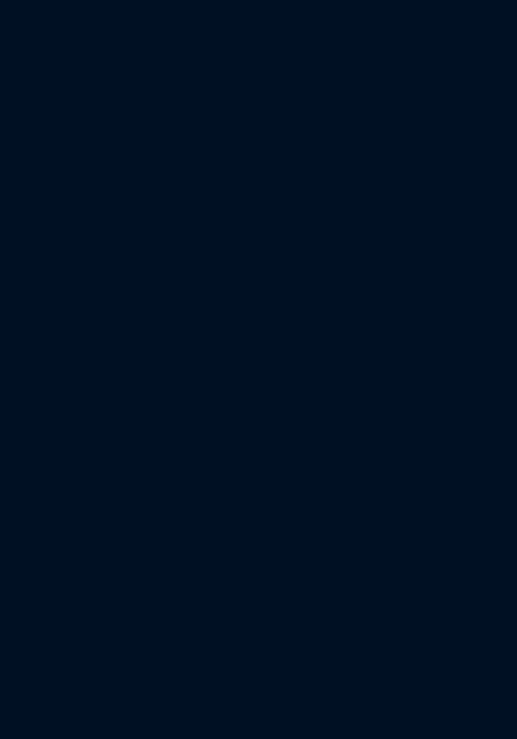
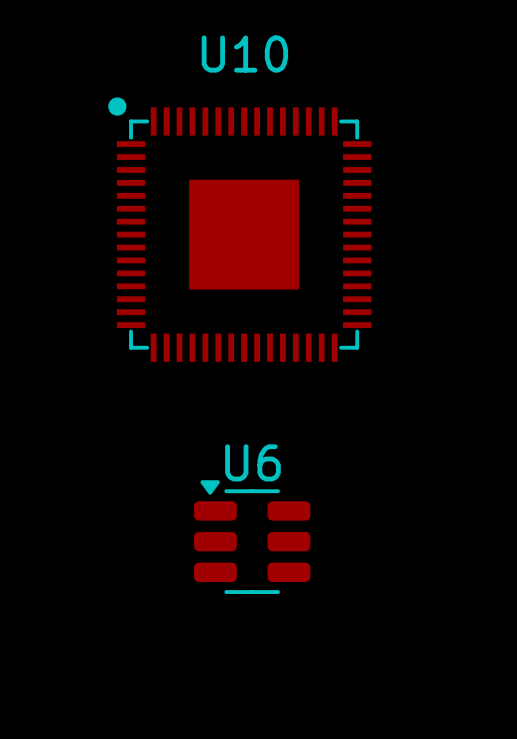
U10: none -> (239, 229)
U6: none -> (252, 537)

